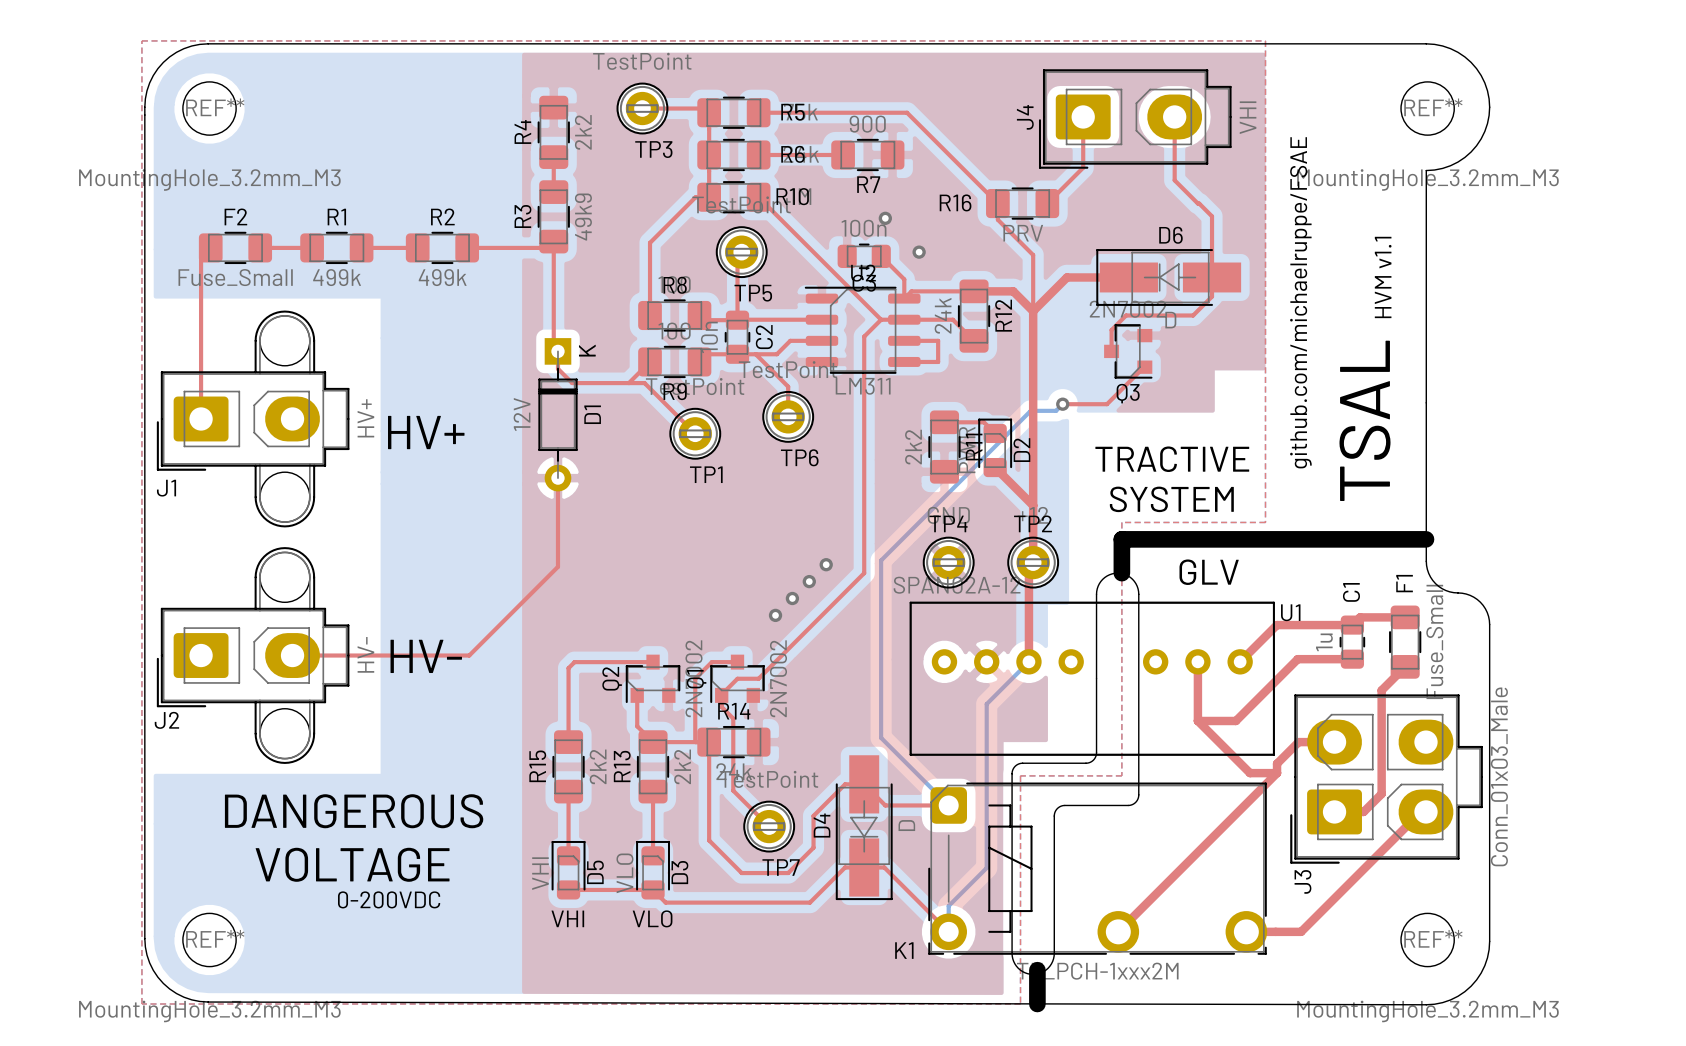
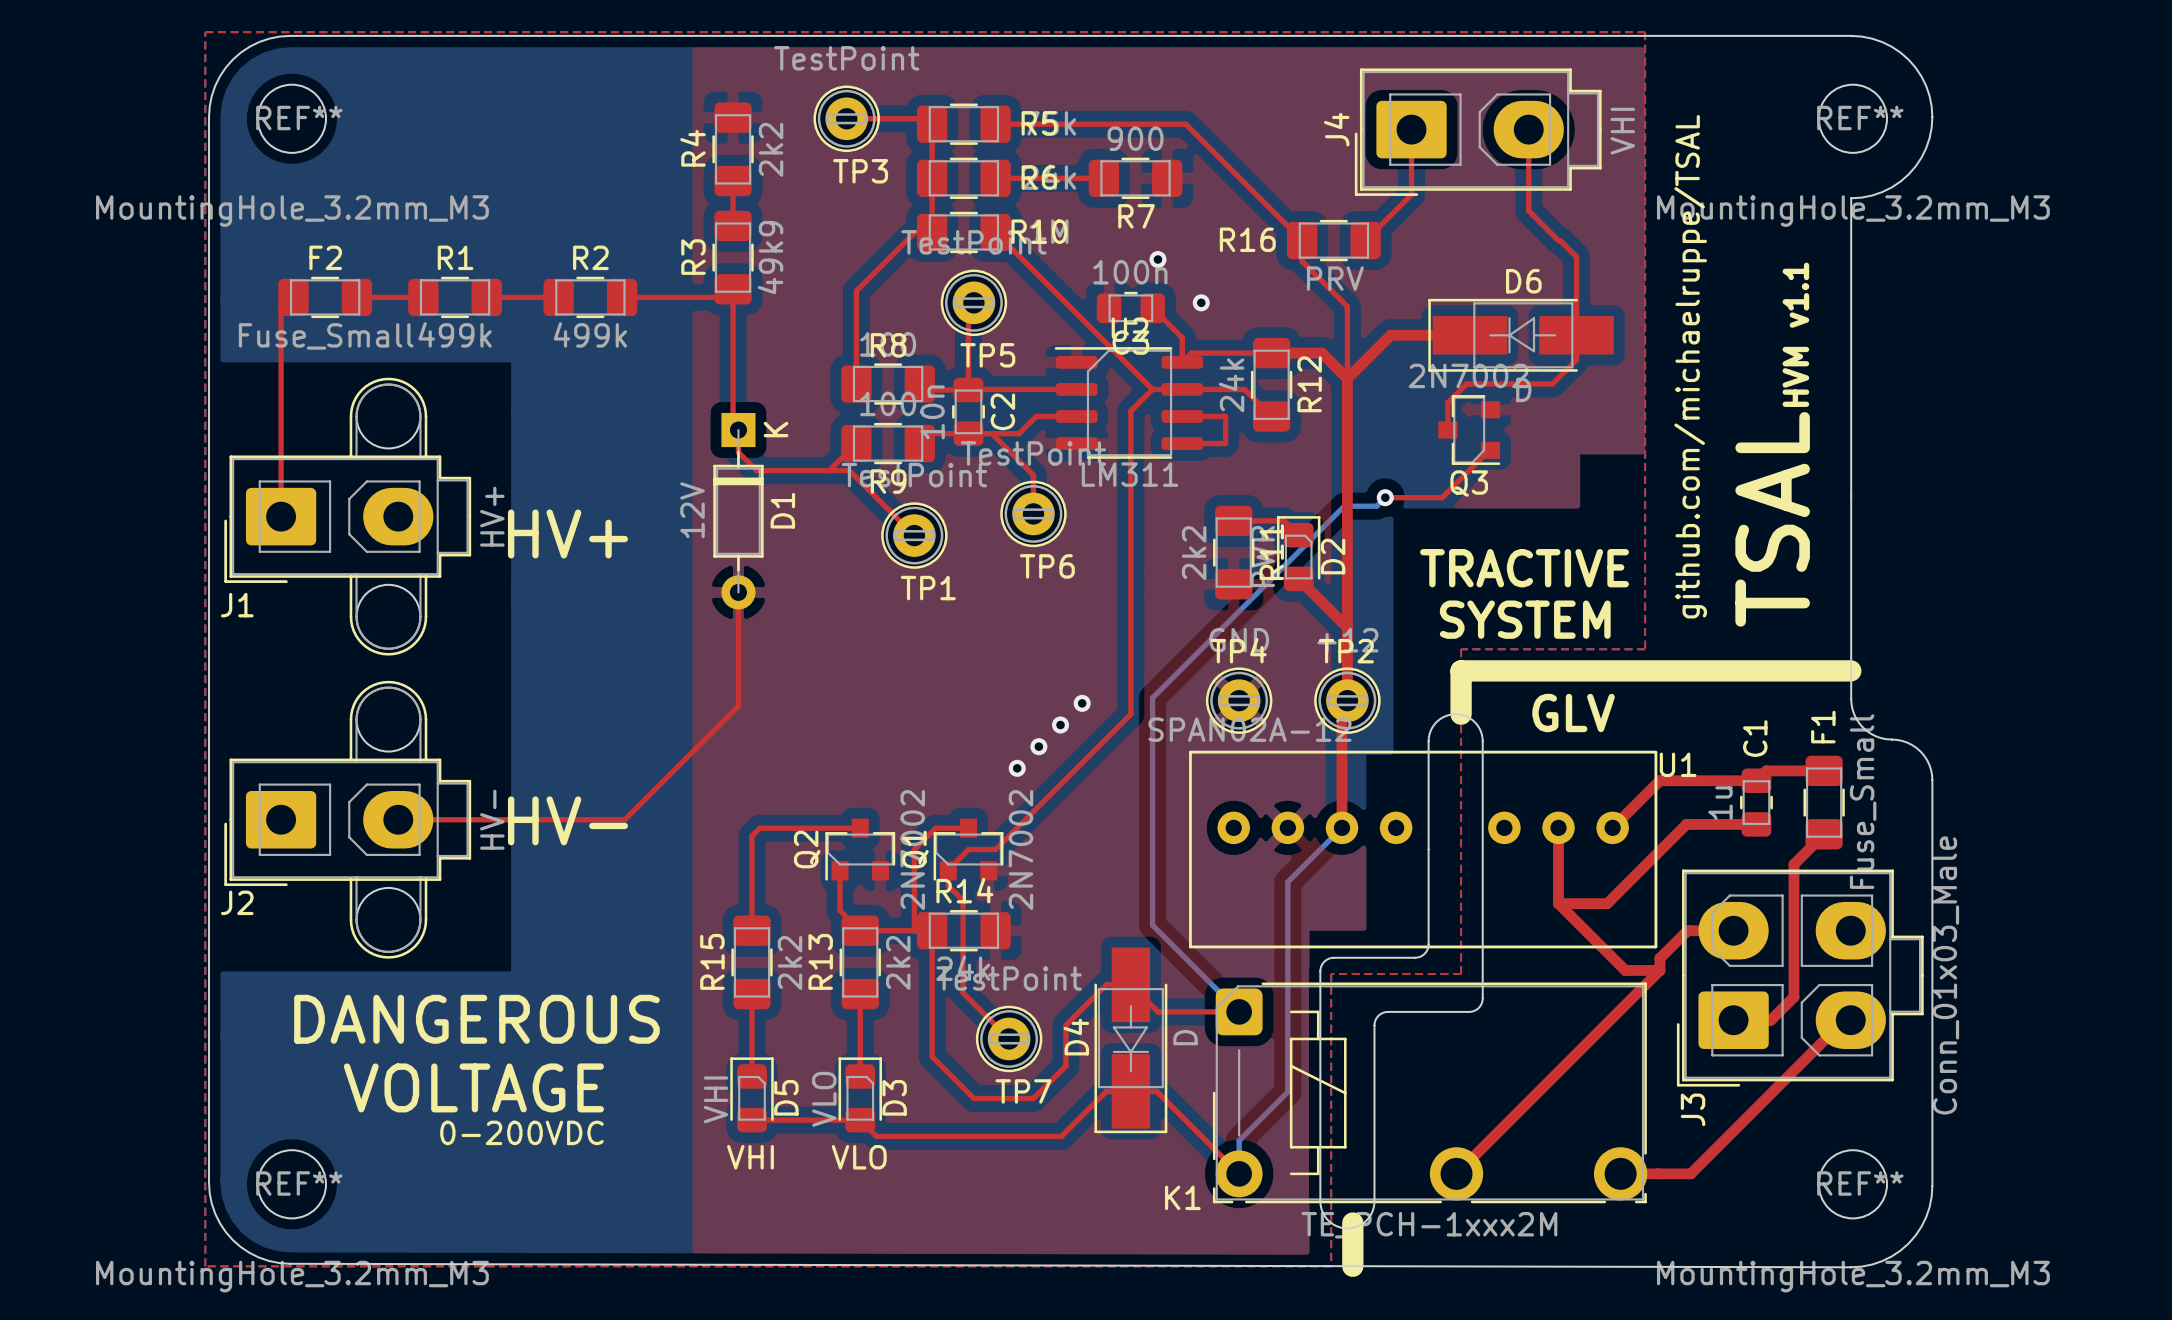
text: github.com/michaelruppe/FSAE (1300, 302) -> github.com/michaelruppe/TSAL (1690, 366)

